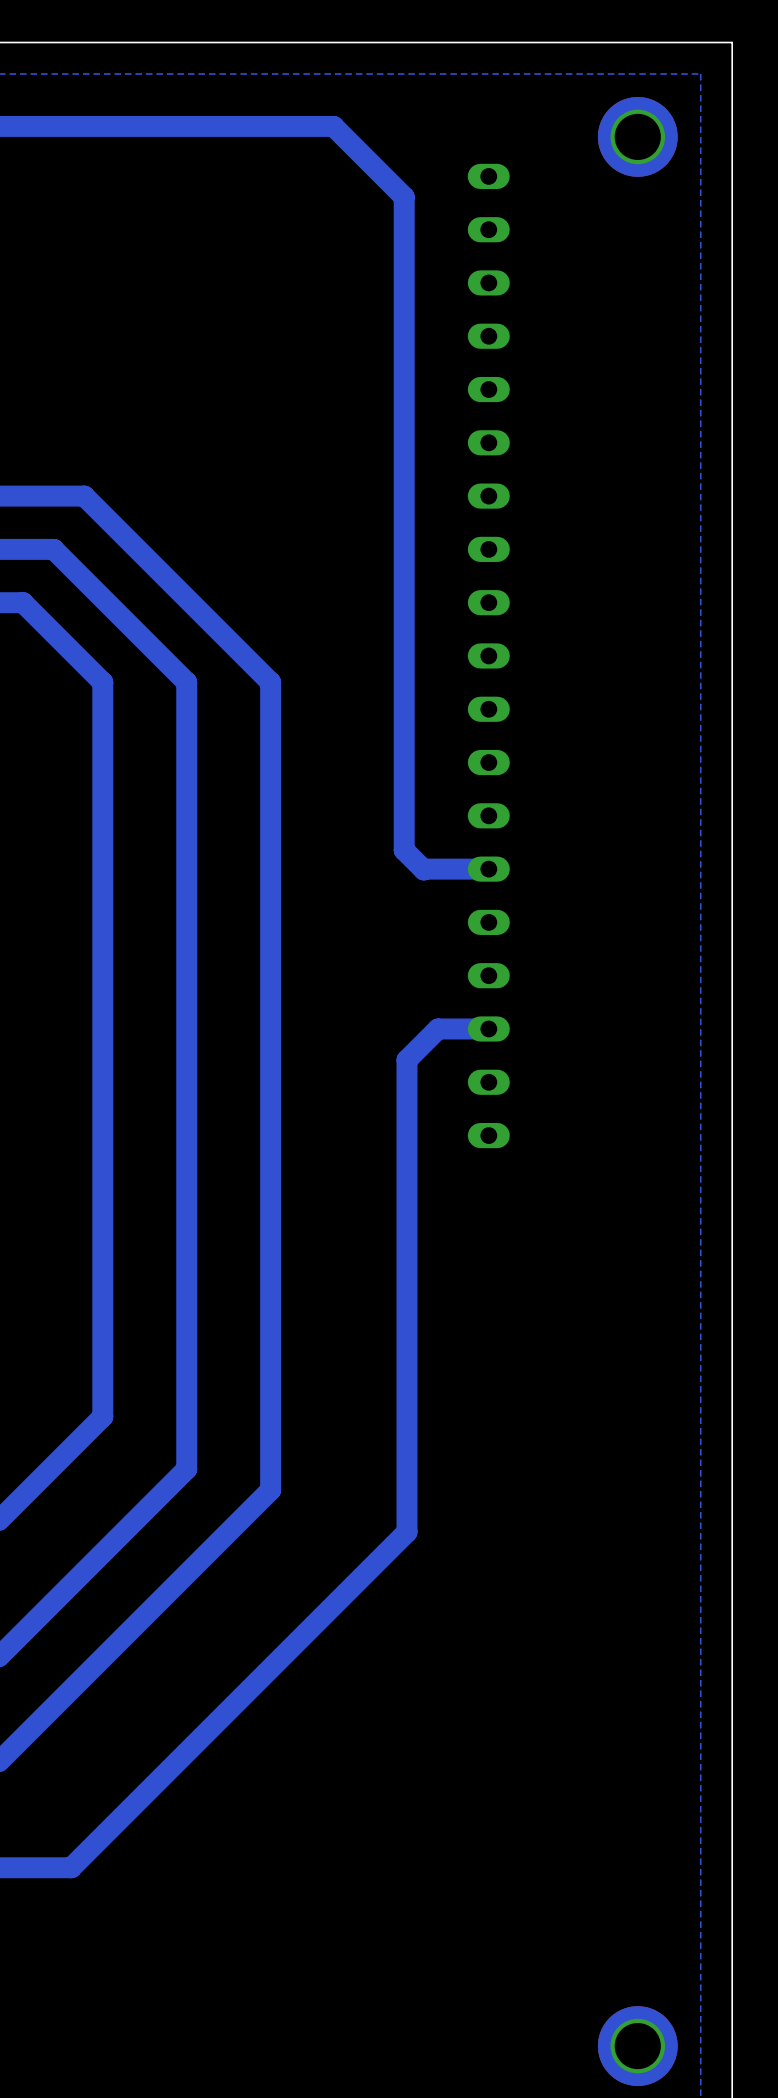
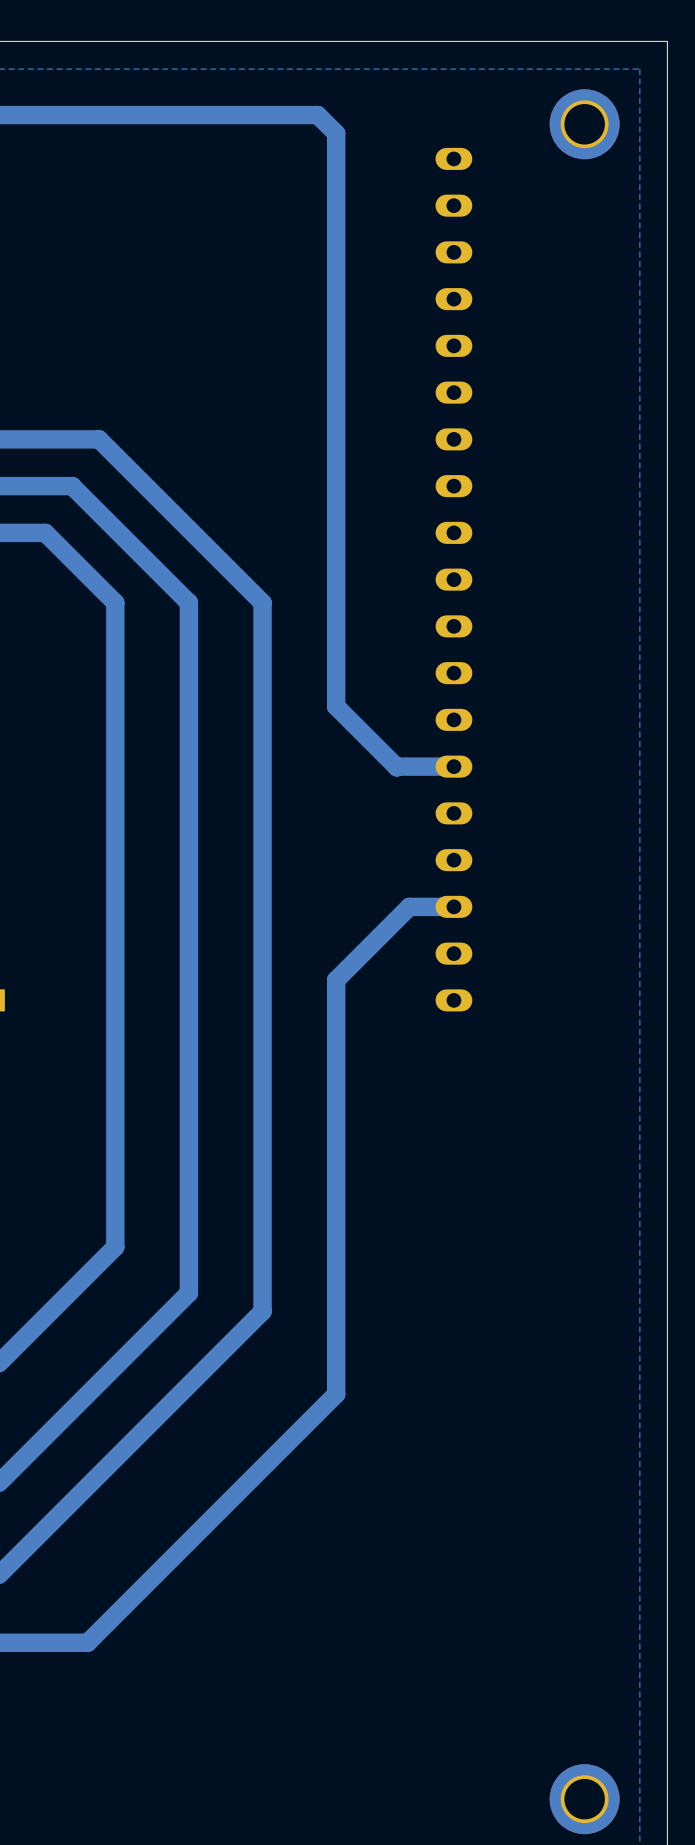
bottom track: (354, 147) (404, 197) (404, 850) -> (336, 133) (336, 706) (379, 750)
bottom track: (407, 1060) (407, 1532) (354, 1584) -> (382, 934) (336, 980) (336, 1394)

